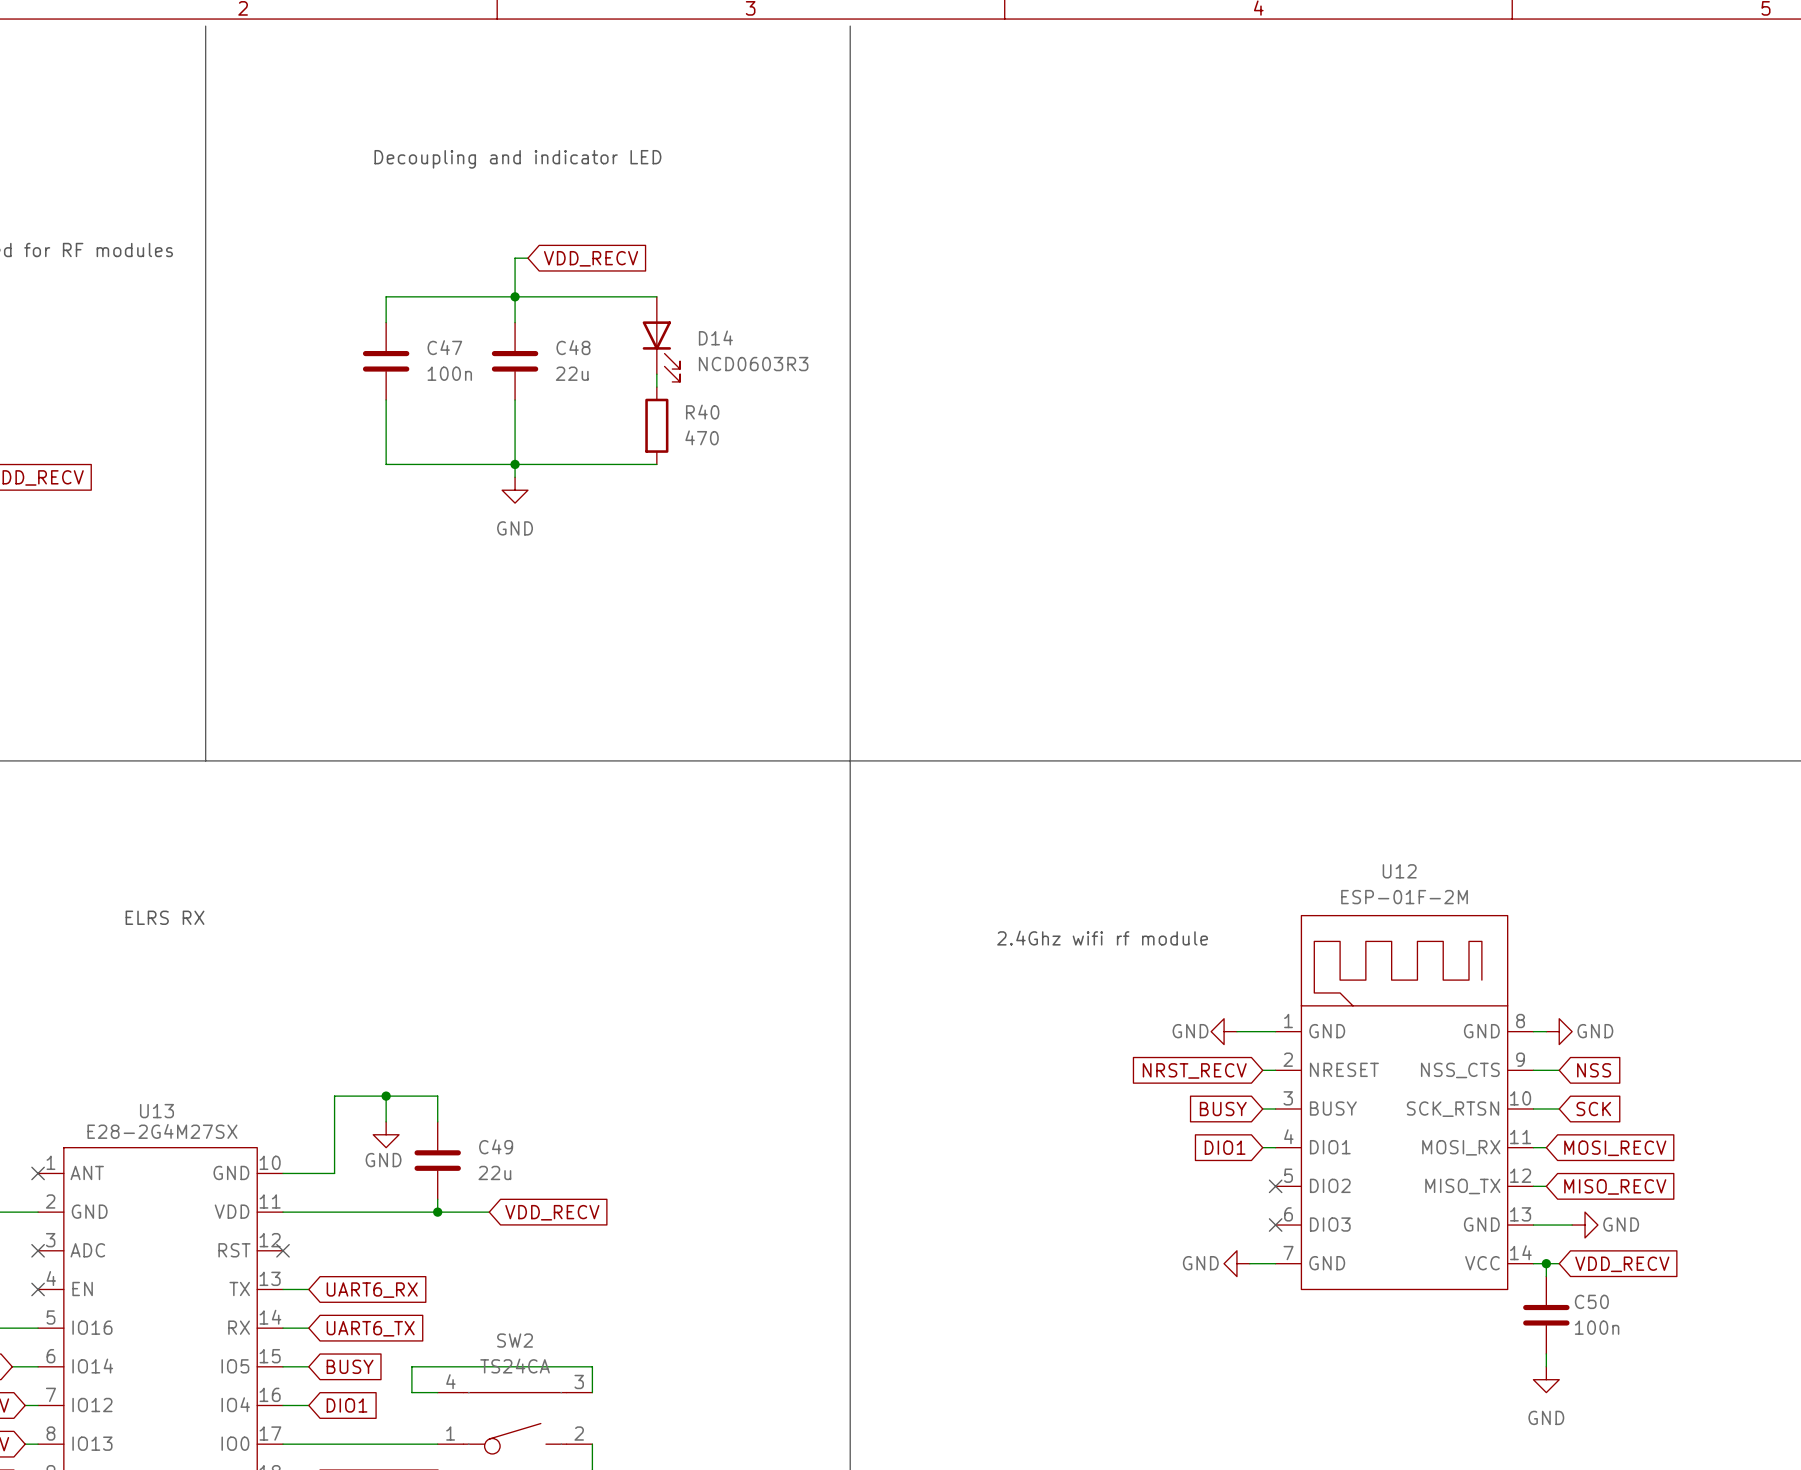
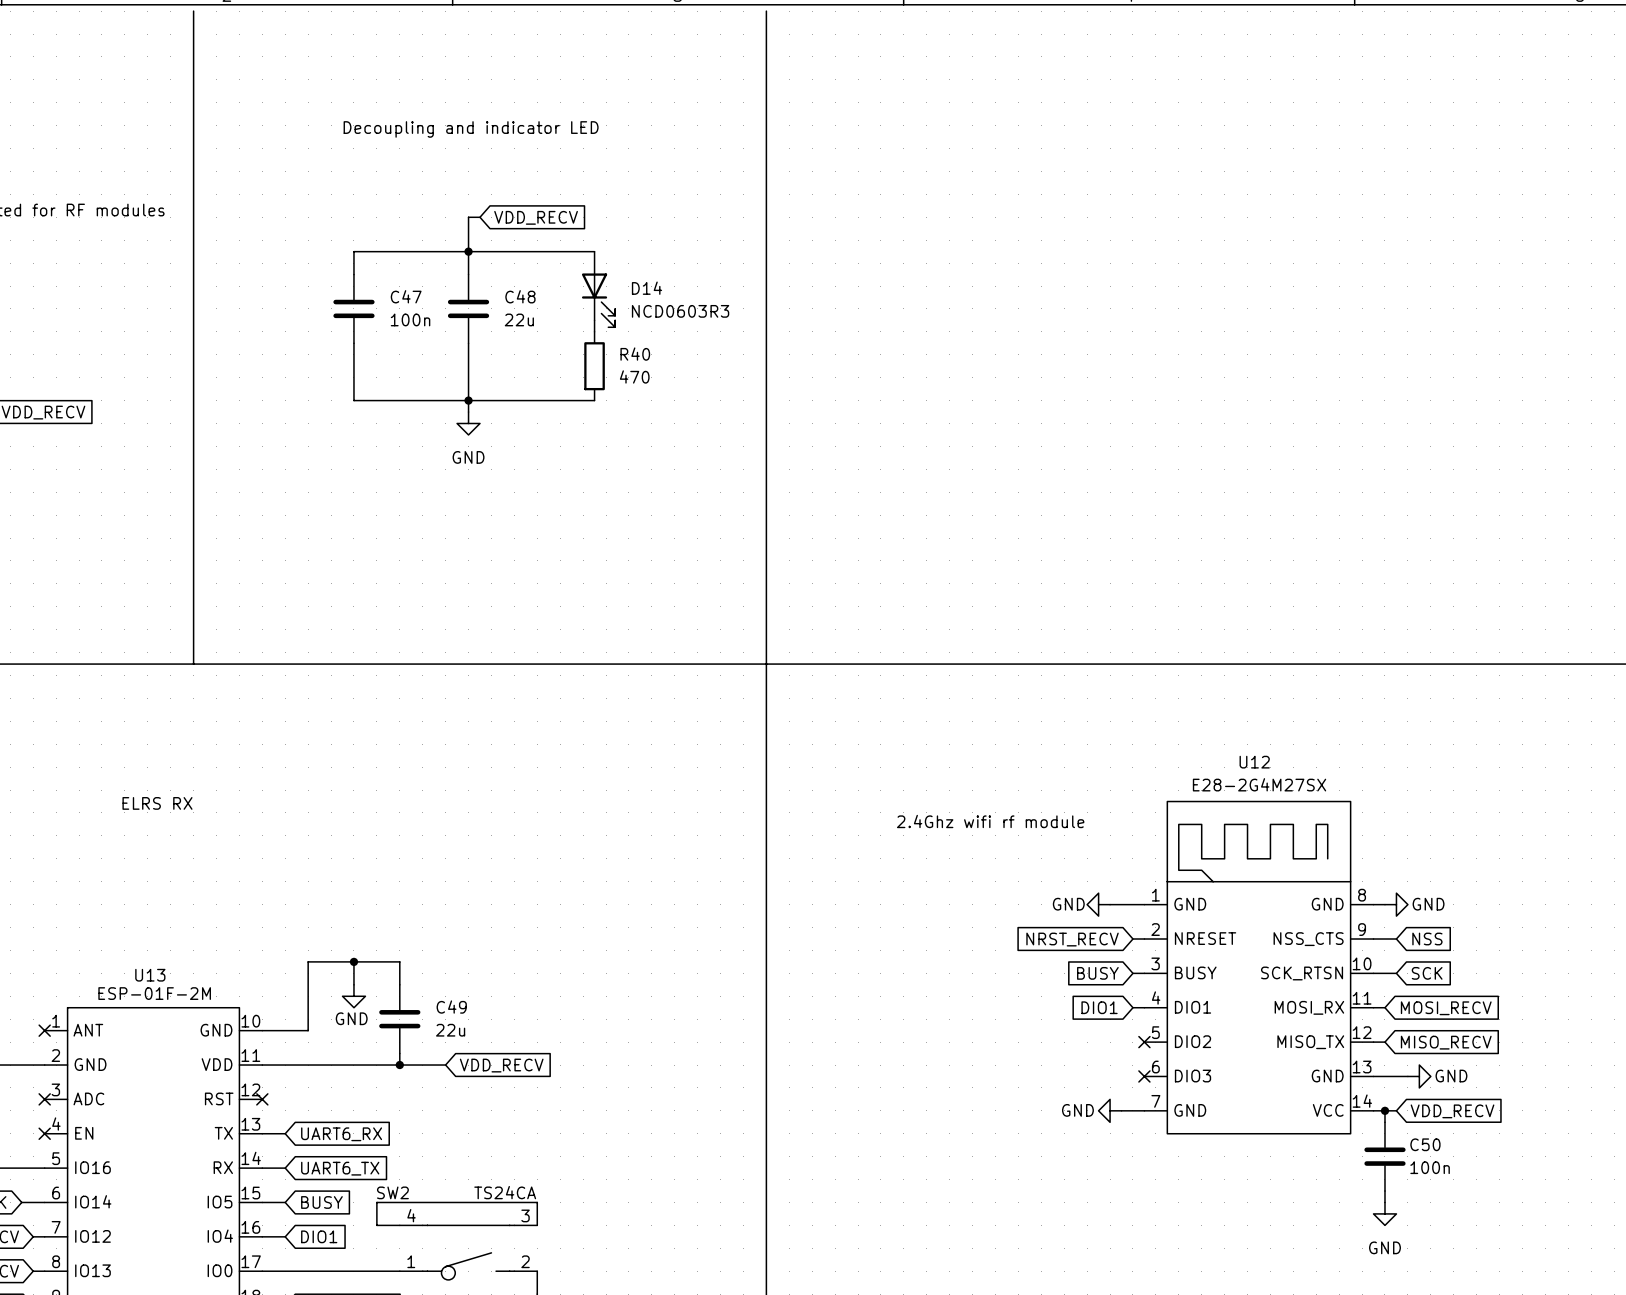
U12 value: ESP-01F-2M (1404, 897) -> E28-2G4M27SX (1259, 784)
U13 value: E28-2G4M27SX (162, 1131) -> ESP-01F-2M (154, 993)
SW2 name position: SW2 (515, 1340) -> SW2 (392, 1192)
SW2 value position: TS24CA (515, 1366) -> TS24CA (505, 1192)

